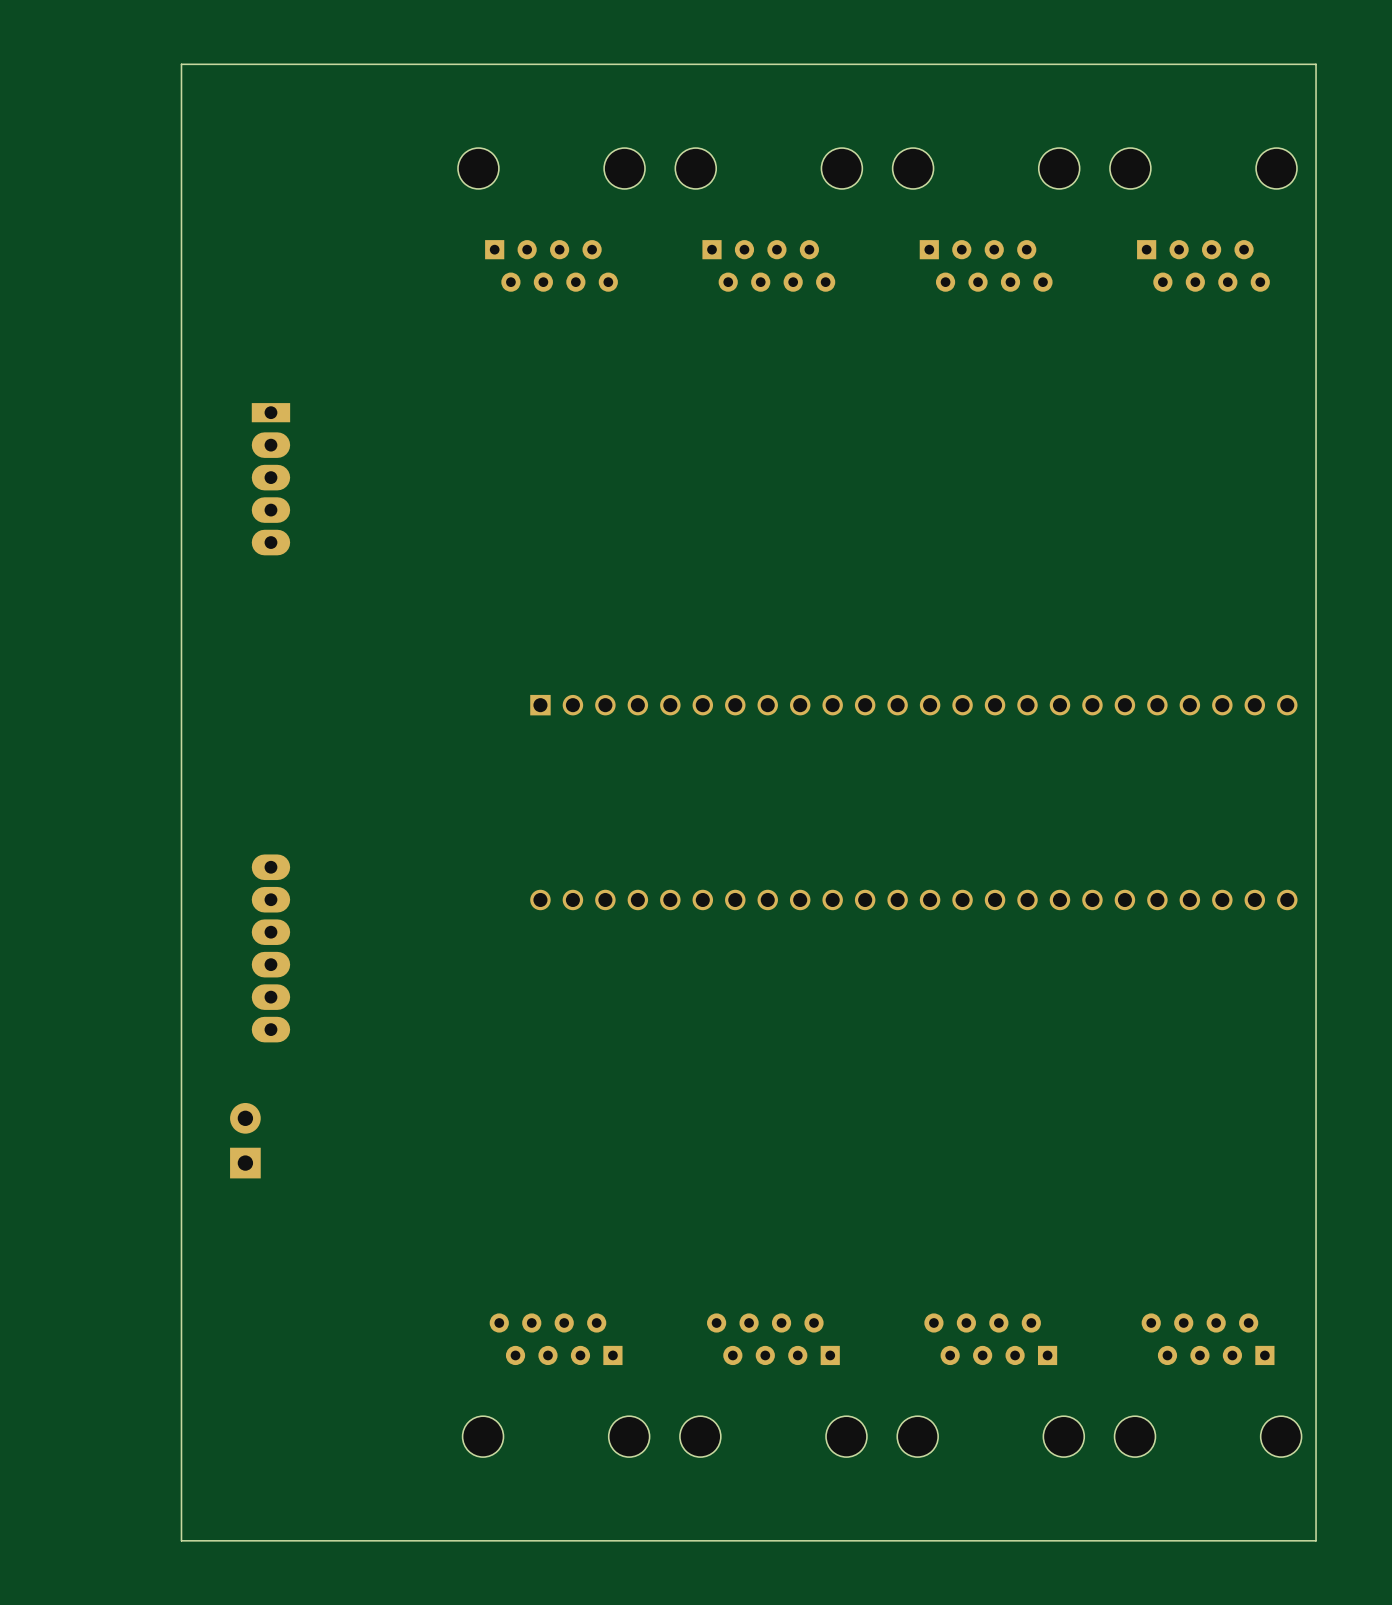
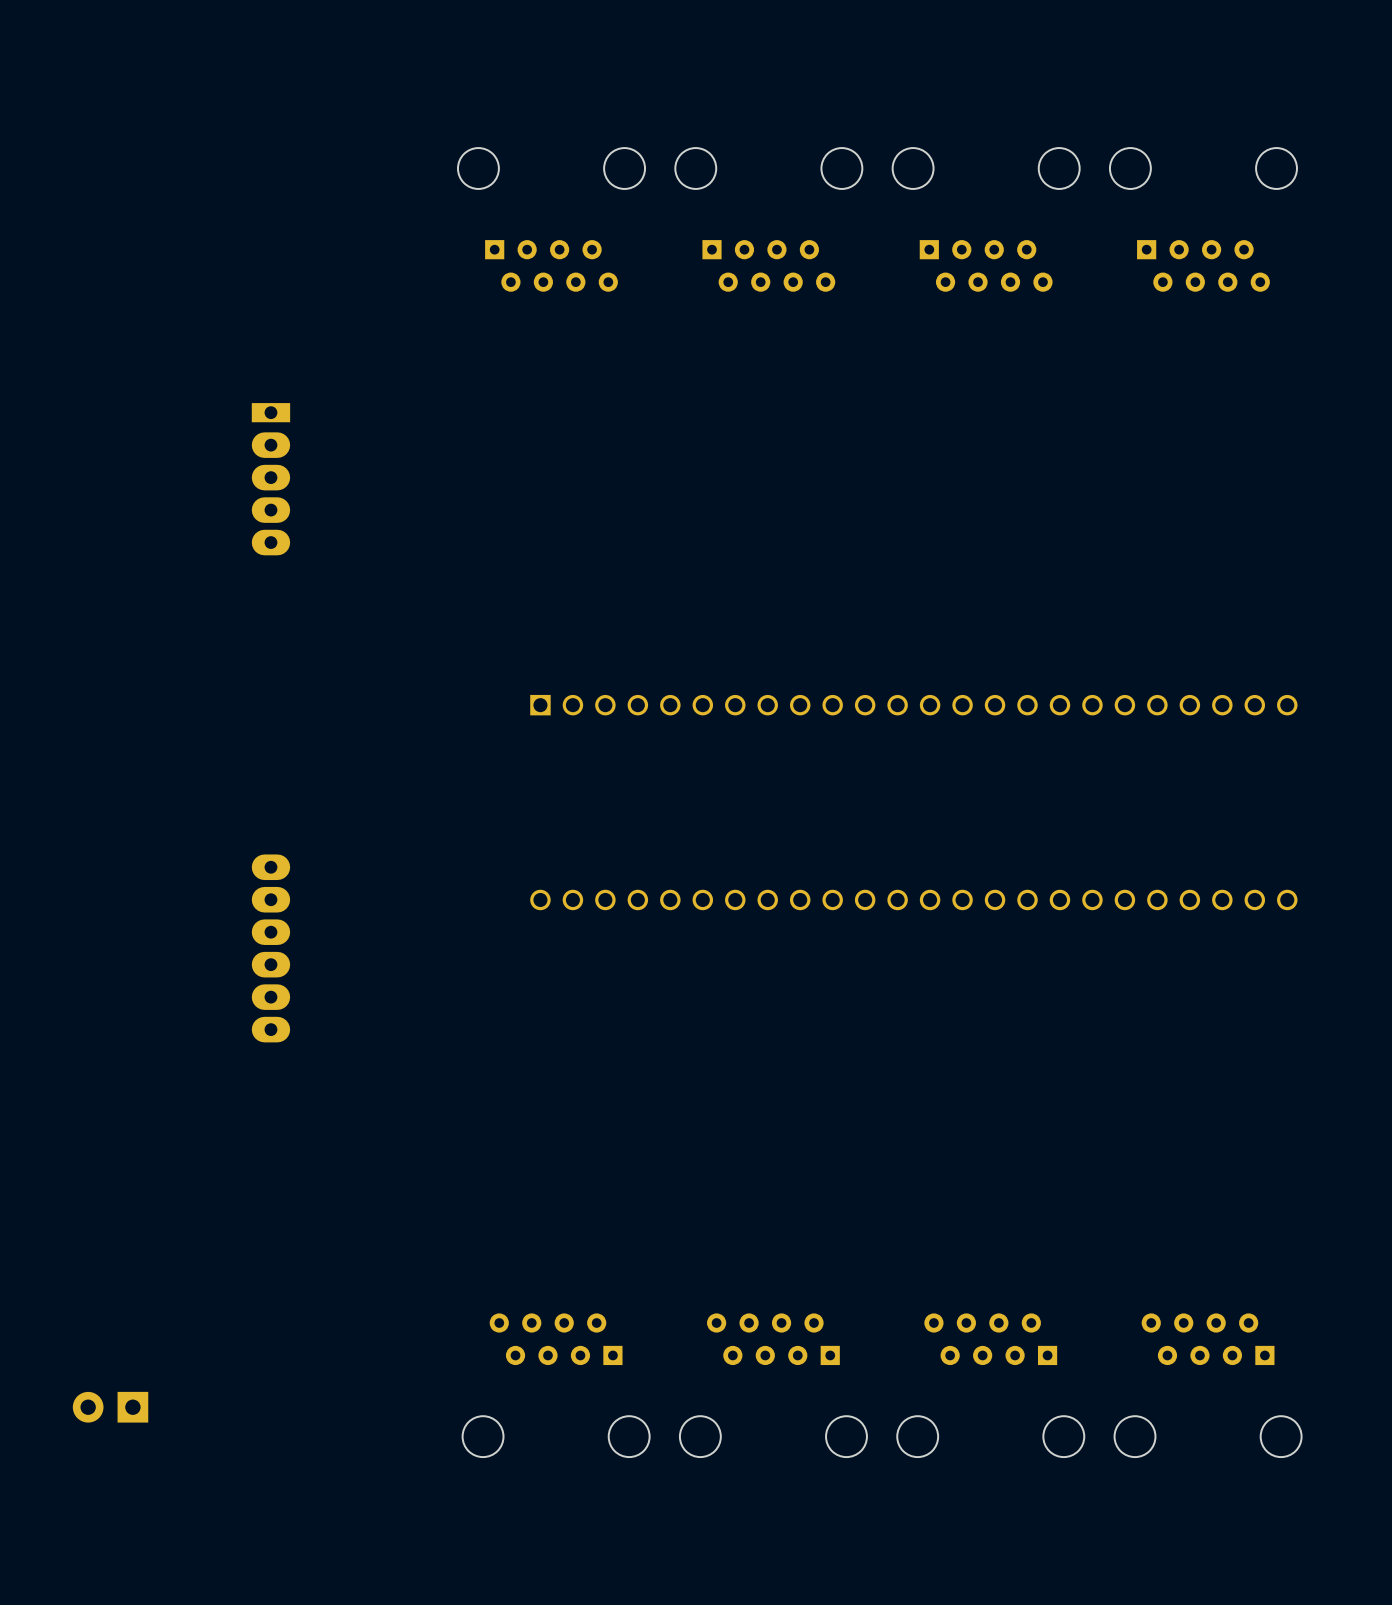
board edge: (1316, 64) (1316, 1540) (181, 1540) (181, 64) (1316, 64) -> none
part rotation: 0° (245, 1140) -> 90° counterclockwise (110, 1407)
part position: (245, 1140) -> (110, 1407)

